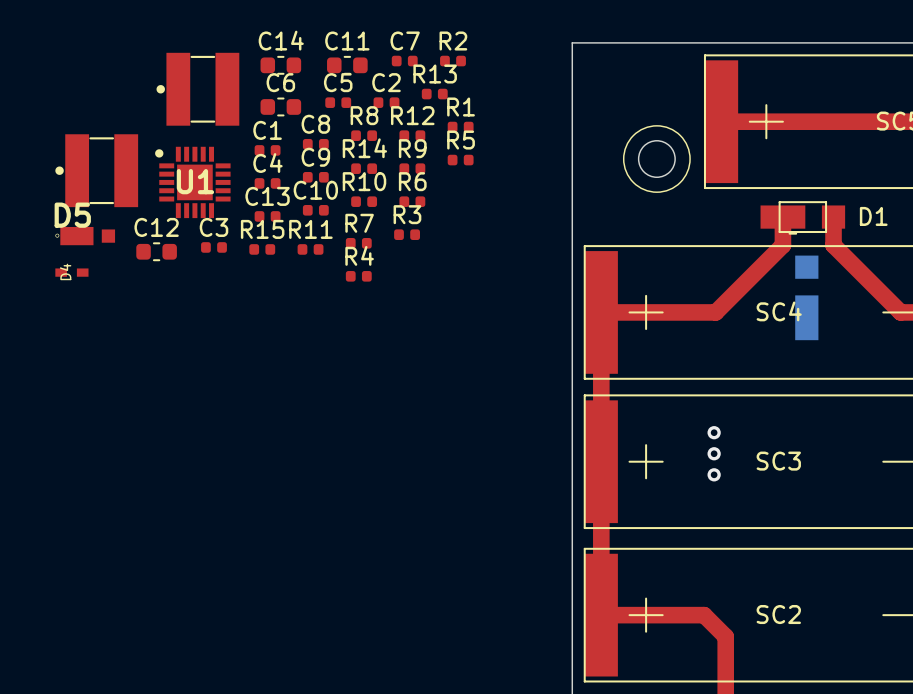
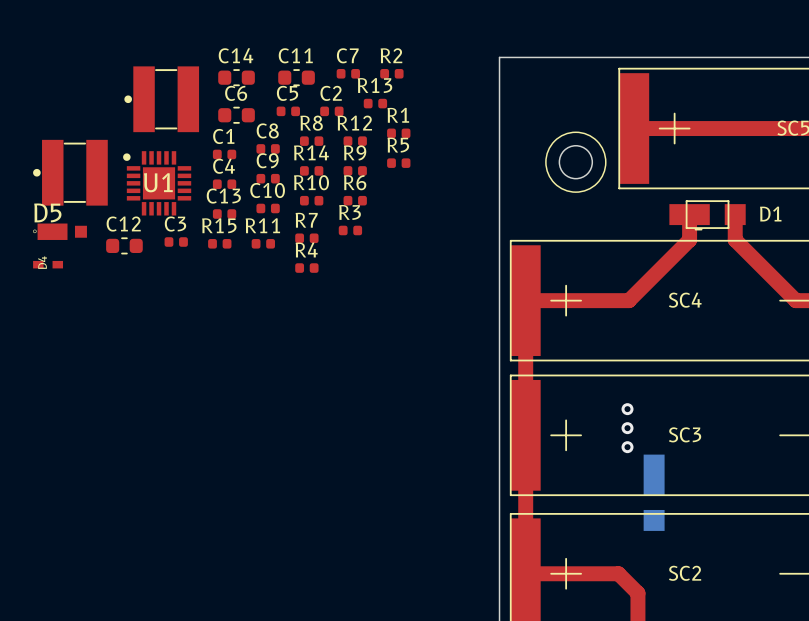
part rotation: 0° (806, 297) -> 180° (654, 492)
part position: (806, 297) -> (654, 492)

